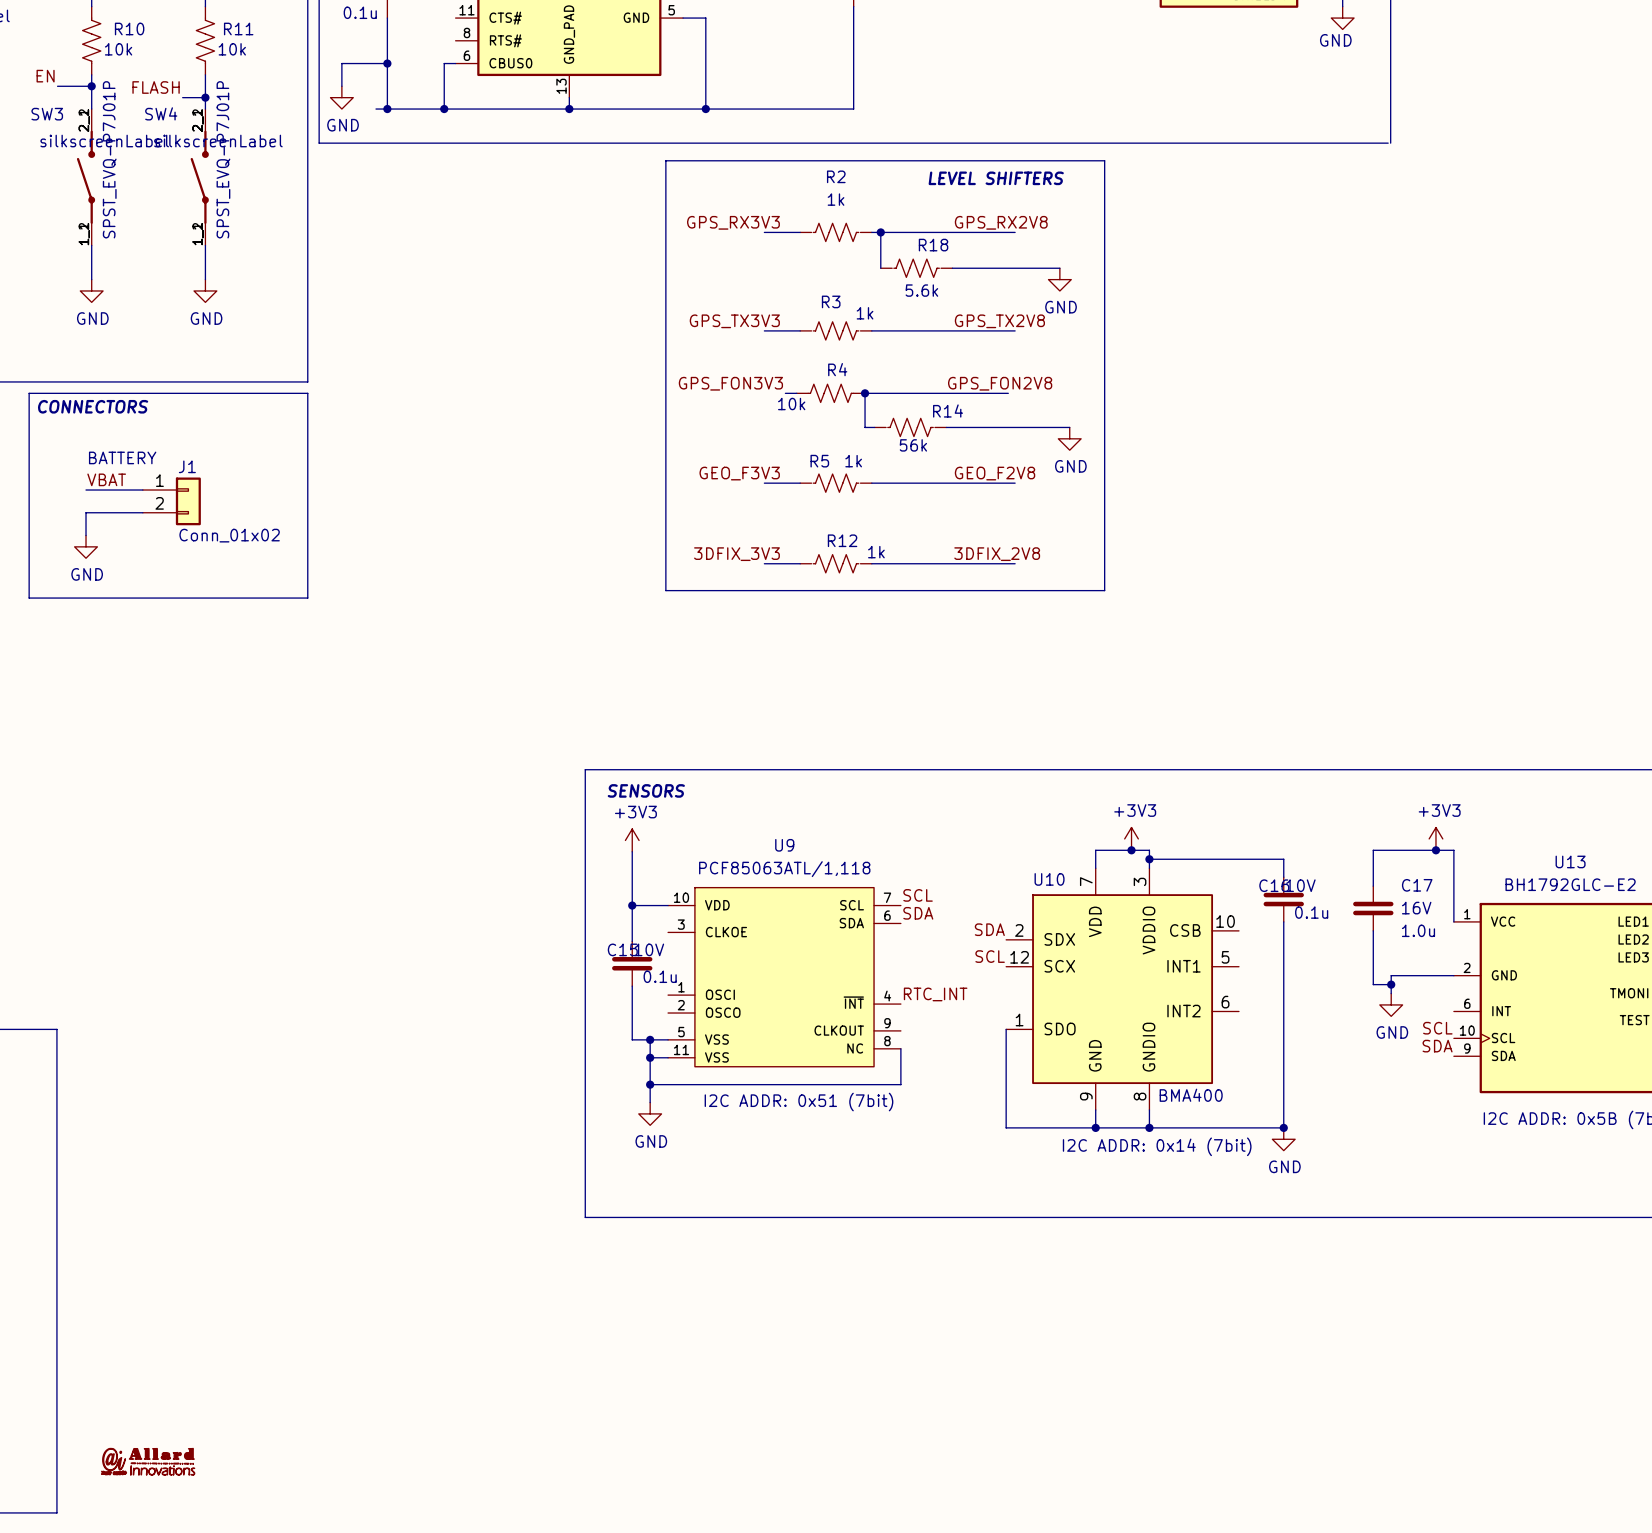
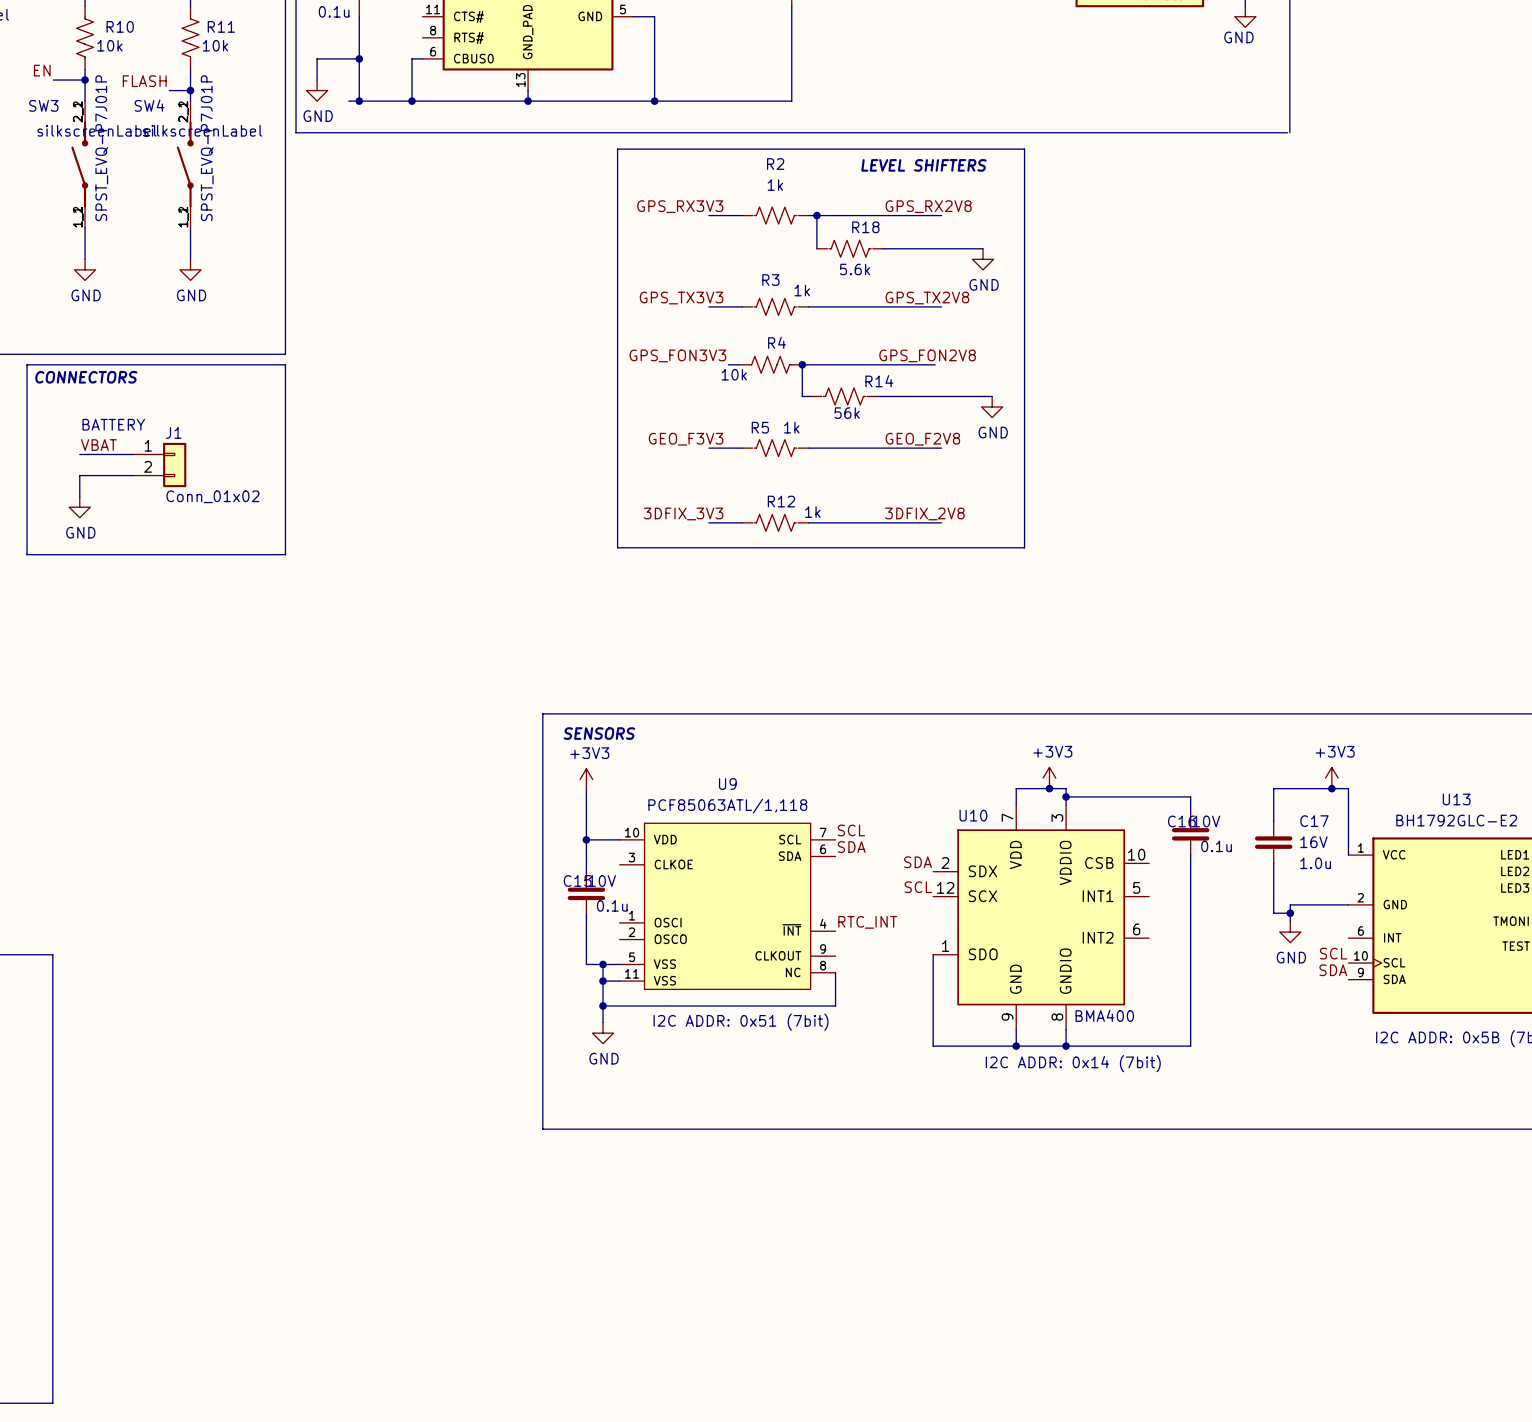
junction: (1283, 1127) -> none
power symbol: GND (1283, 1139) -> none
part: (148, 1461) -> none

